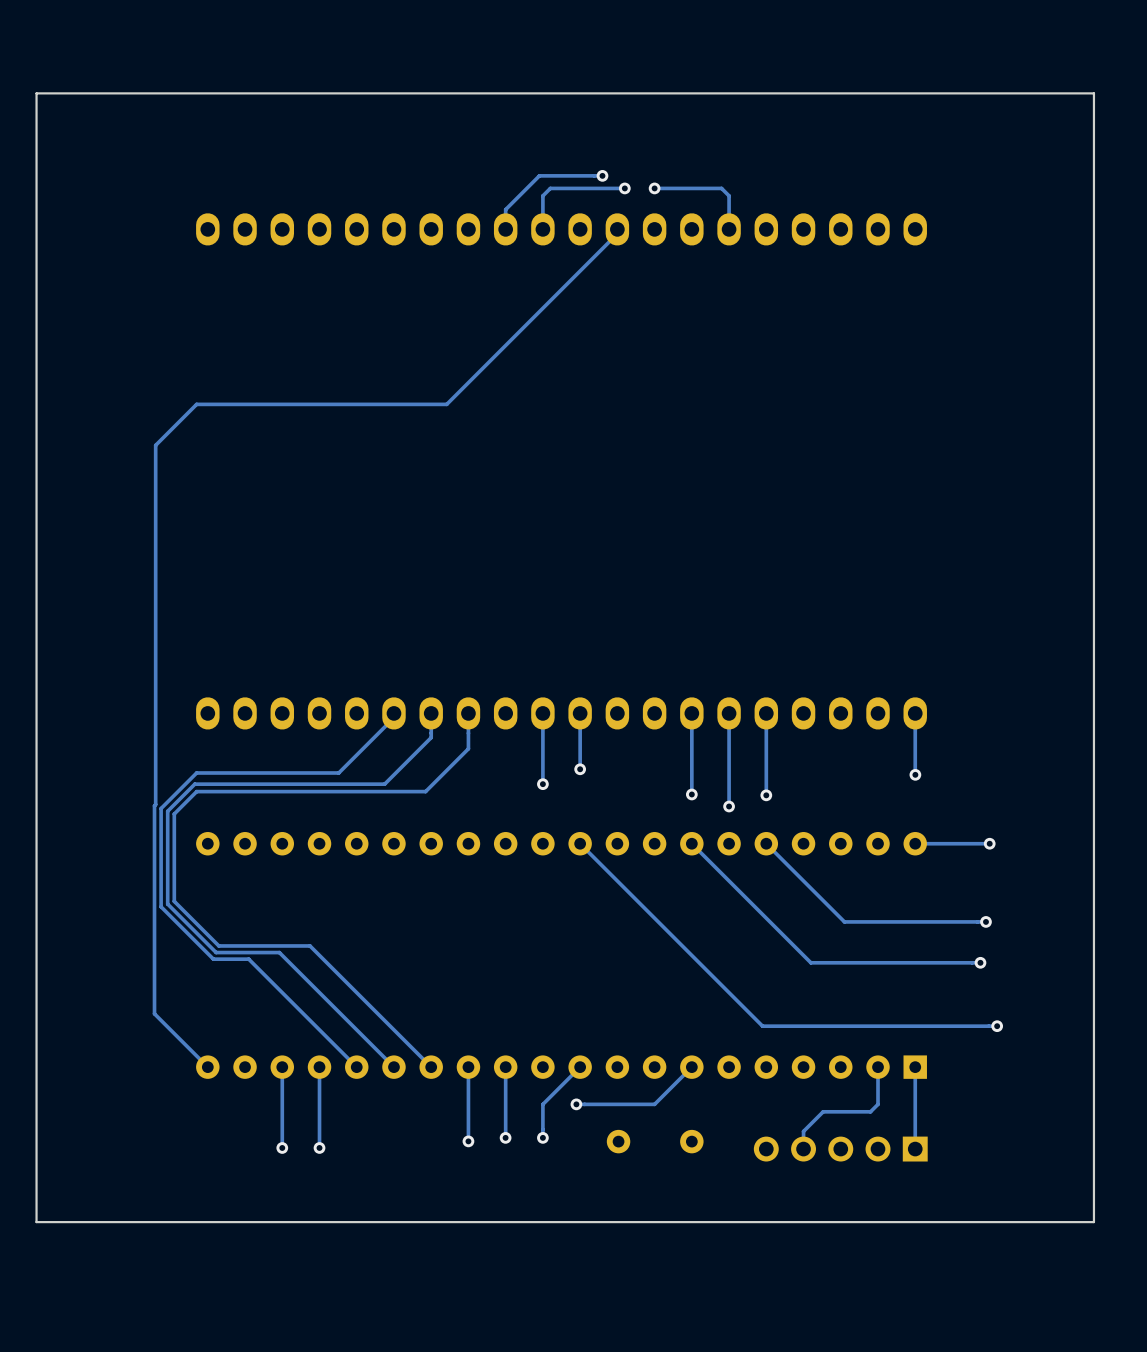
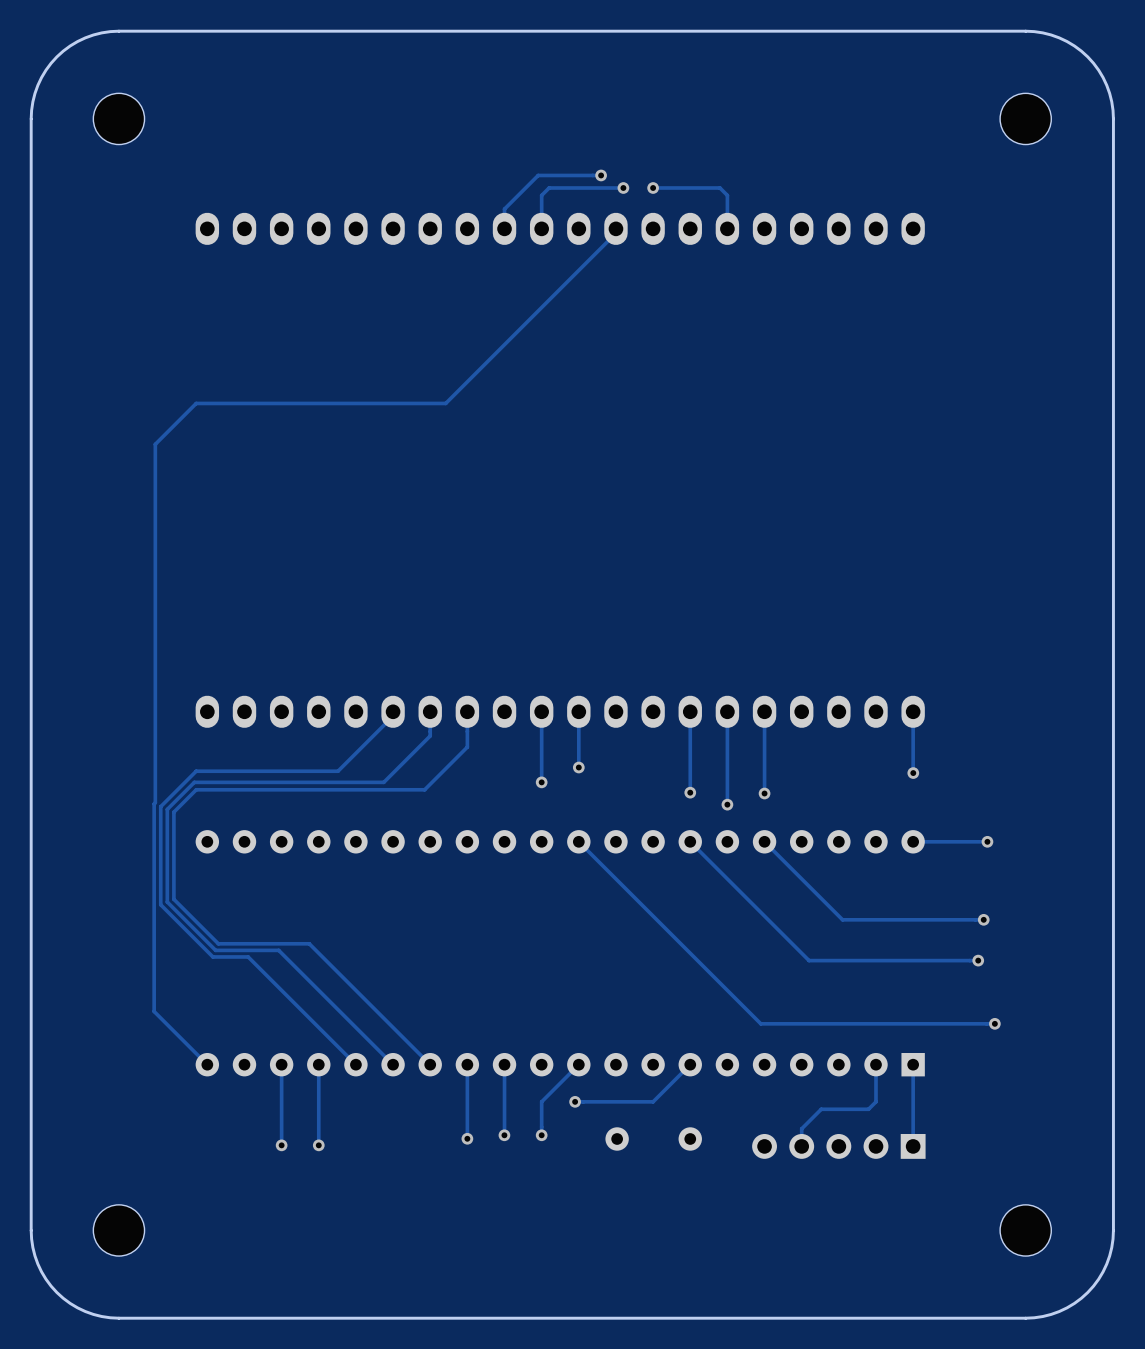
board edge: (1093, 93) (36, 93) (36, 1222) (1093, 1222) (1093, 93) -> (1025, 31) (1042, 32) (1059, 37) (1081, 51) (1093, 63) (1103, 77) (1109, 93) (1113, 110) (1113, 1230) (1111, 1247) (1106, 1264) (1093, 1286) (1081, 1298) (1059, 1311) (1042, 1316) (1025, 1318) (118, 1318) (101, 1316) (85, 1311) (63, 1298) (51, 1286) (37, 1264) (32, 1247) (31, 1230) (31, 118) (32, 101) (37, 85) (51, 63) (63, 51) (85, 37) (101, 32) (118, 31) (1025, 31)
part: none -> (118, 118)
part: none -> (1025, 118)
part: none -> (118, 1230)
part: none -> (1025, 1230)

